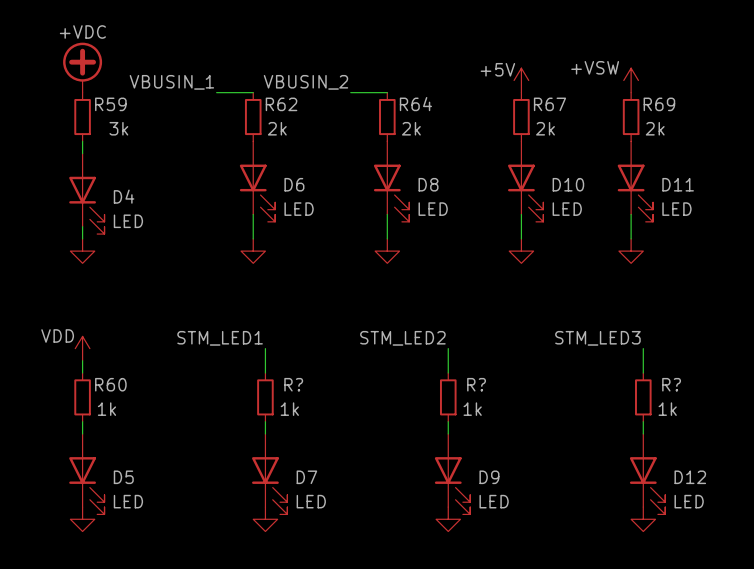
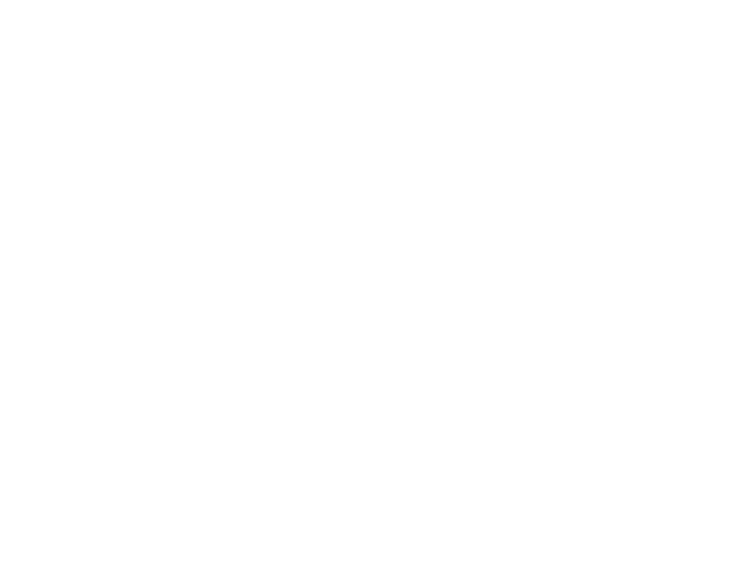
power symbol: +VDC (82, 67) -> none
power symbol: +5V (521, 80) -> none
power symbol: +VSW (631, 80) -> none
label: VBUSIN_1 (171, 82) -> none
label: VBUSIN_2 (305, 82) -> none
wire: (216, 92) (253, 92) -> none
wire: (350, 92) (387, 92) -> none
R59: 3k (82, 117) -> none
R62: 2k (253, 117) -> none
R64: 2k (387, 117) -> none
R67: 2k (521, 117) -> none
R69: 2k (631, 117) -> none
wire: (82, 141) (82, 153) -> none
D6: LED (257, 181) -> none
D8: LED (391, 181) -> none
D10: LED (525, 181) -> none
D11: LED (635, 181) -> none
D4: LED (86, 193) -> none
wire: (253, 214) (253, 238) -> none
wire: (387, 214) (387, 238) -> none
wire: (521, 214) (521, 238) -> none
wire: (631, 214) (631, 238) -> none
wire: (82, 226) (82, 238) -> none
power symbol: (82, 251) -> none
power symbol: (253, 251) -> none
power symbol: (387, 251) -> none
power symbol: (521, 251) -> none
power symbol: (631, 251) -> none
label: STM_LED1 (220, 338) -> none
label: STM_LED2 (402, 338) -> none
label: STM_LED3 (597, 338) -> none
power symbol: VDD (82, 348) -> none
wire: (265, 348) (265, 373) -> none
wire: (448, 348) (448, 373) -> none
wire: (643, 348) (643, 373) -> none
wire: (82, 360) (82, 373) -> none
R60: 1k (82, 397) -> none
R?: 1k (265, 397) -> none
R?: 1k (448, 397) -> none
R?: 1k (643, 397) -> none
wire: (82, 421) (82, 433) -> none
wire: (265, 421) (265, 433) -> none
wire: (448, 421) (448, 433) -> none
wire: (643, 421) (643, 433) -> none
D5: LED (86, 474) -> none
D7: LED (269, 474) -> none
D9: LED (452, 474) -> none
D12: LED (647, 474) -> none
power symbol: (82, 519) -> none
power symbol: (265, 519) -> none
power symbol: (448, 519) -> none
power symbol: (643, 519) -> none

